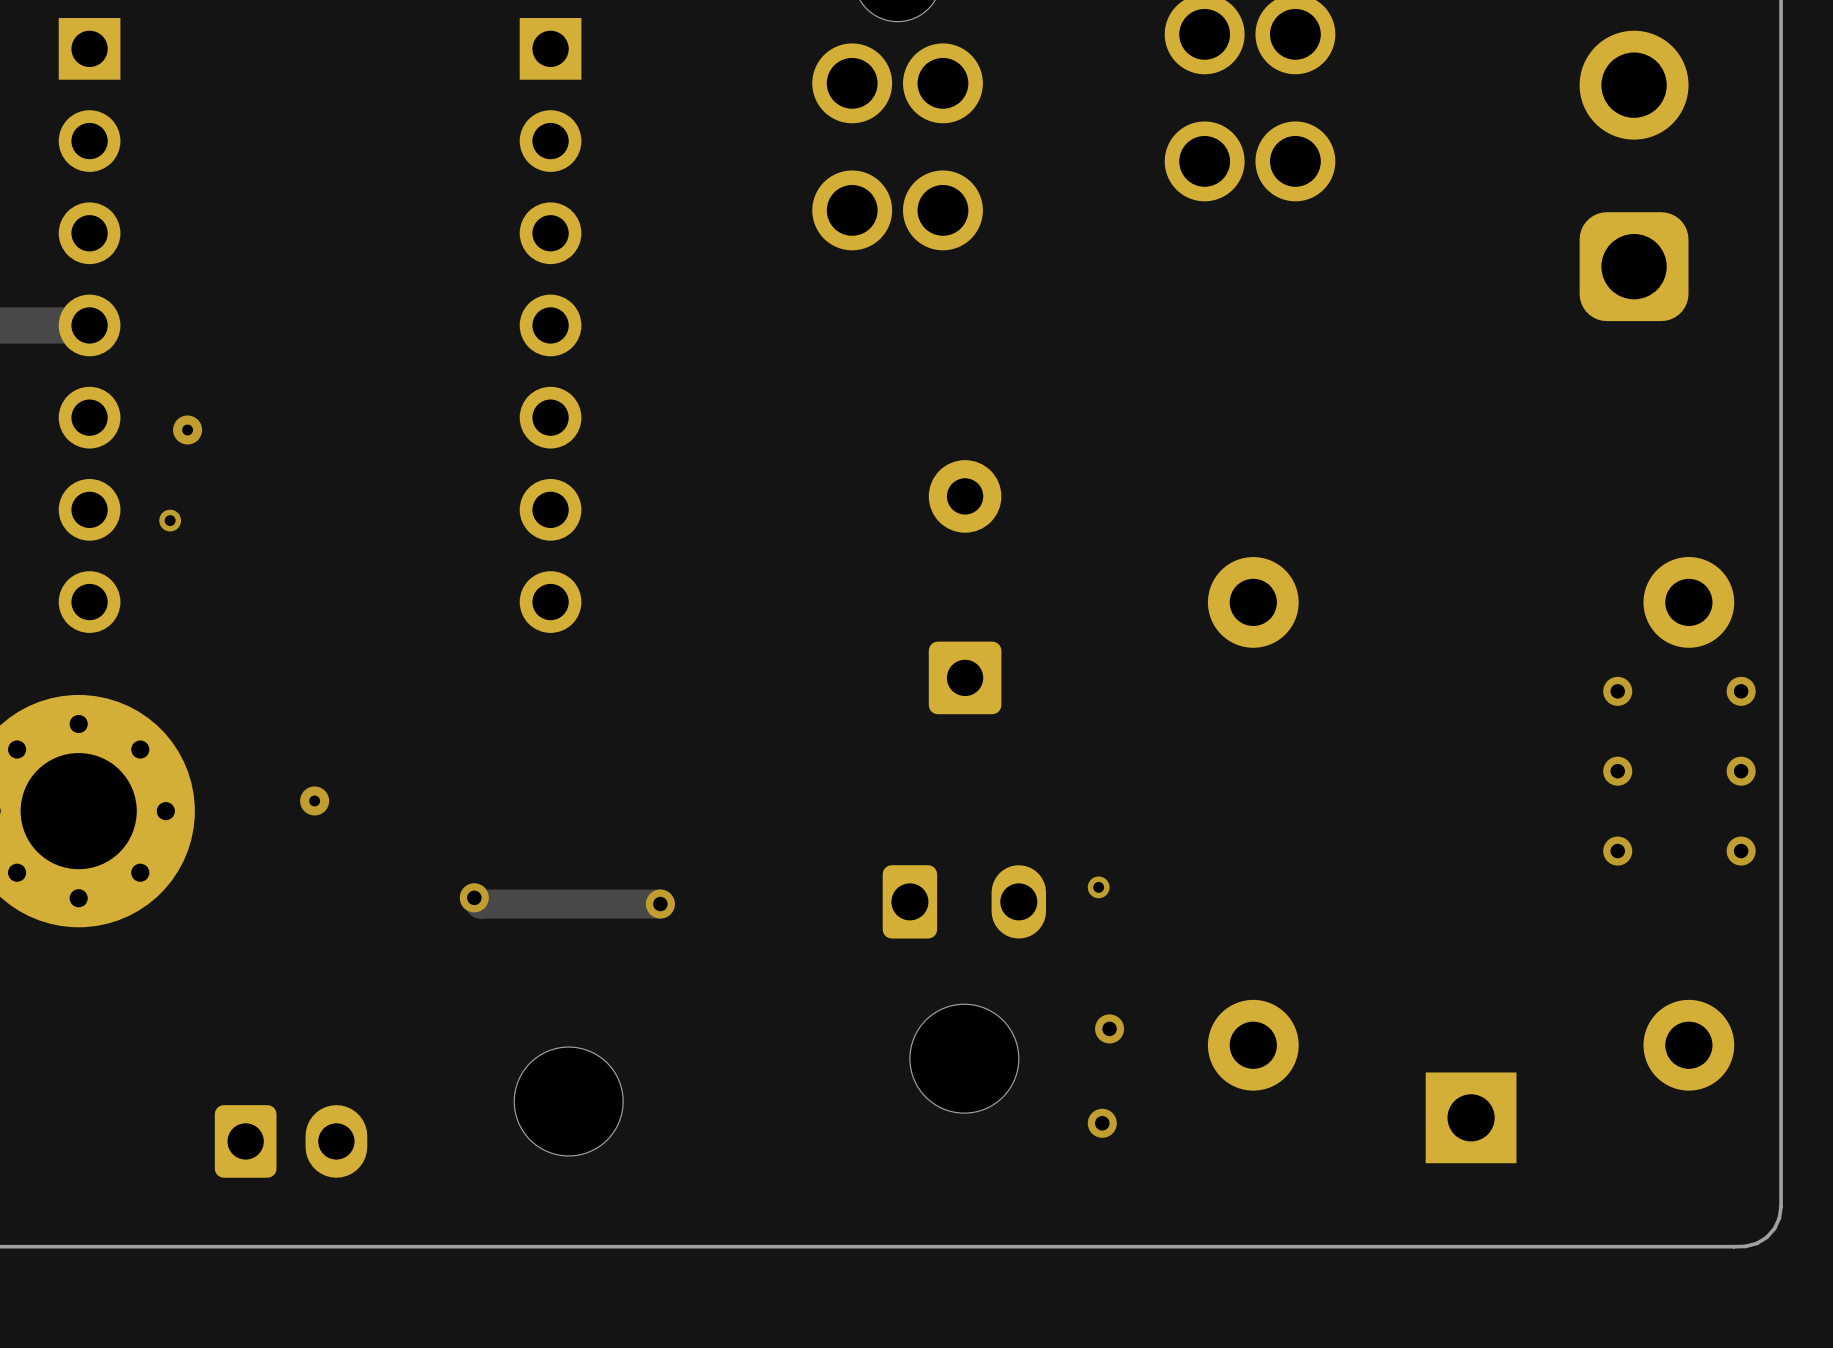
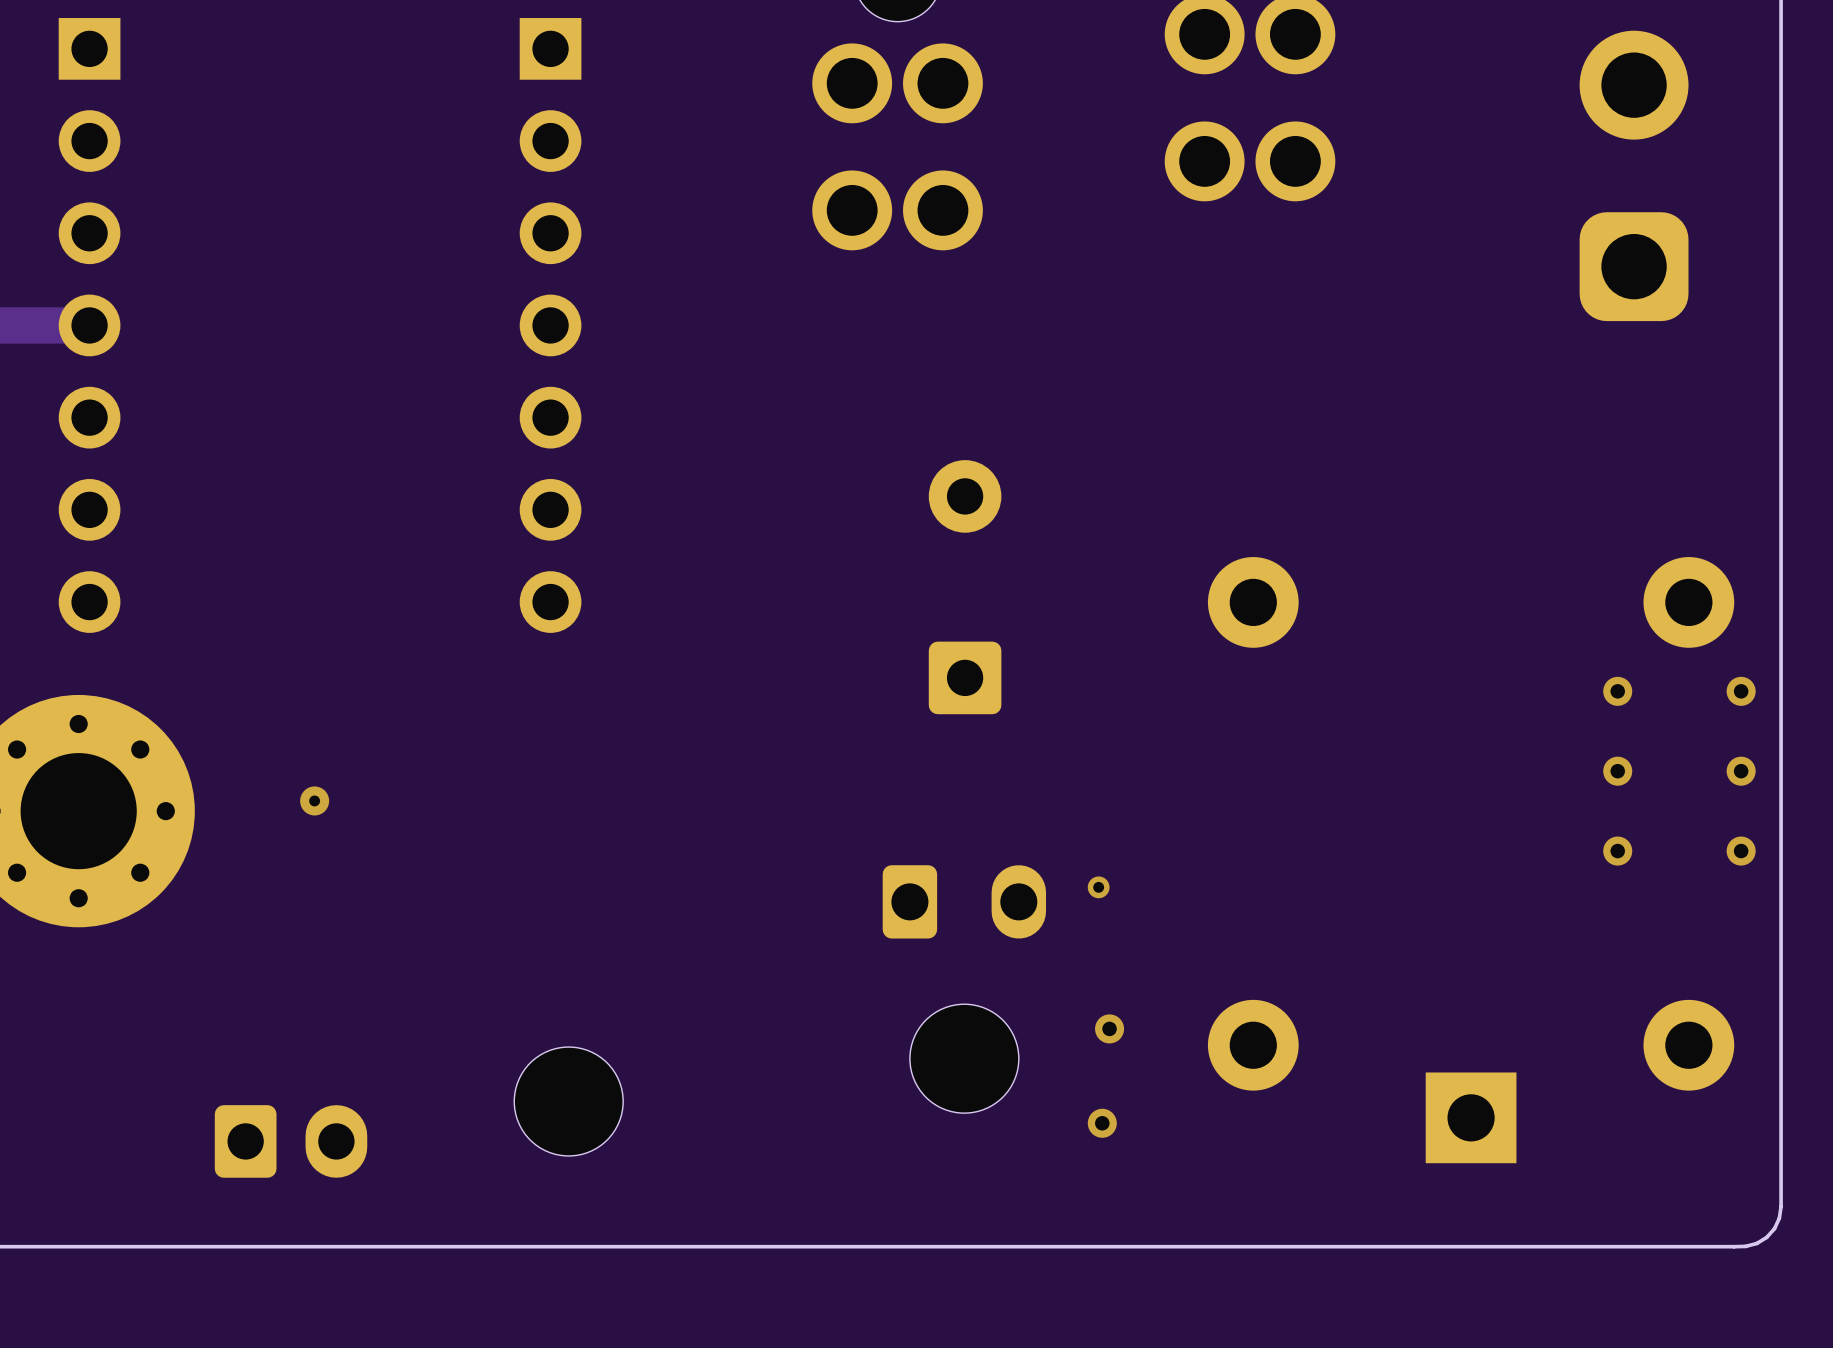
via: (187, 429) -> none
via: (170, 520) -> none
track: (474, 897) (480, 904) (660, 904) -> none
via: (474, 897) -> none
via: (660, 904) -> none

